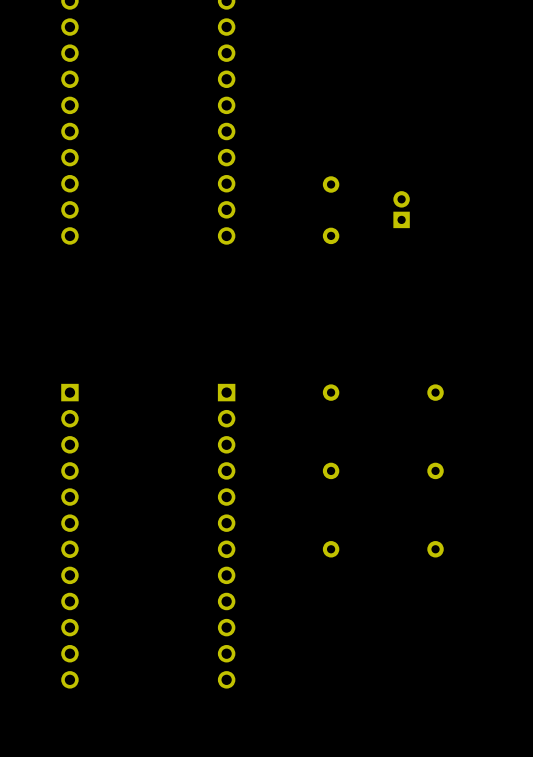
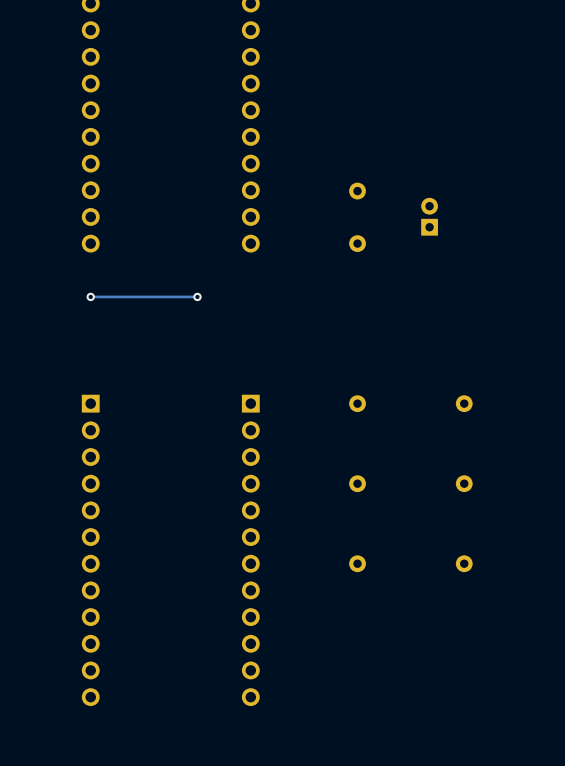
via: none -> (90, 296)
track: none -> (197, 296) (90, 296)
via: none -> (197, 296)

